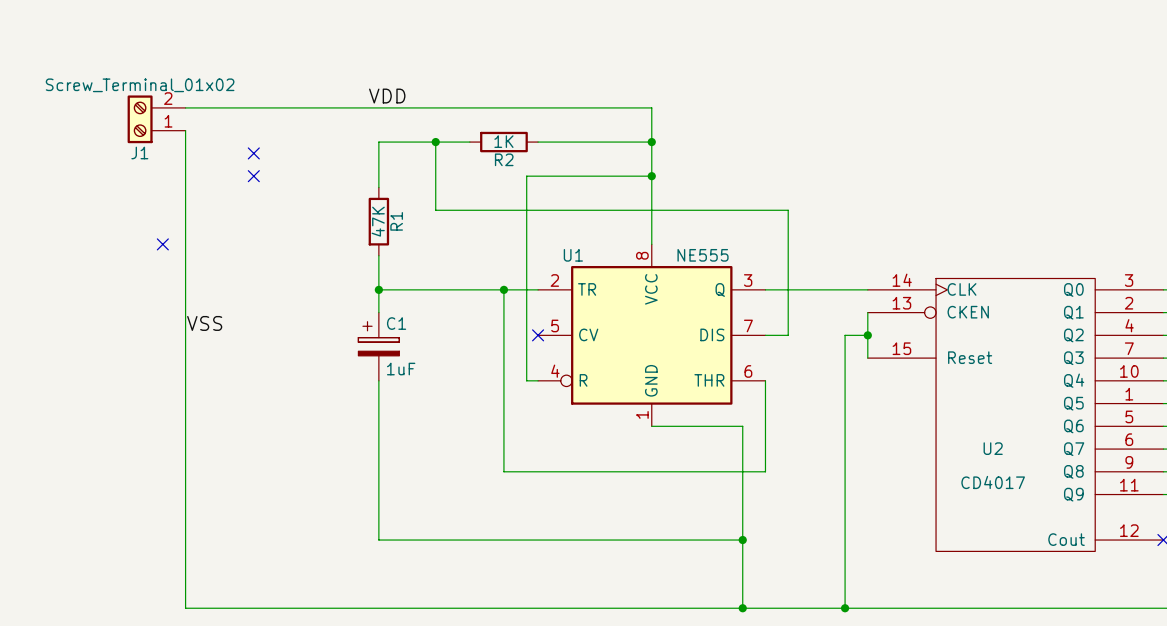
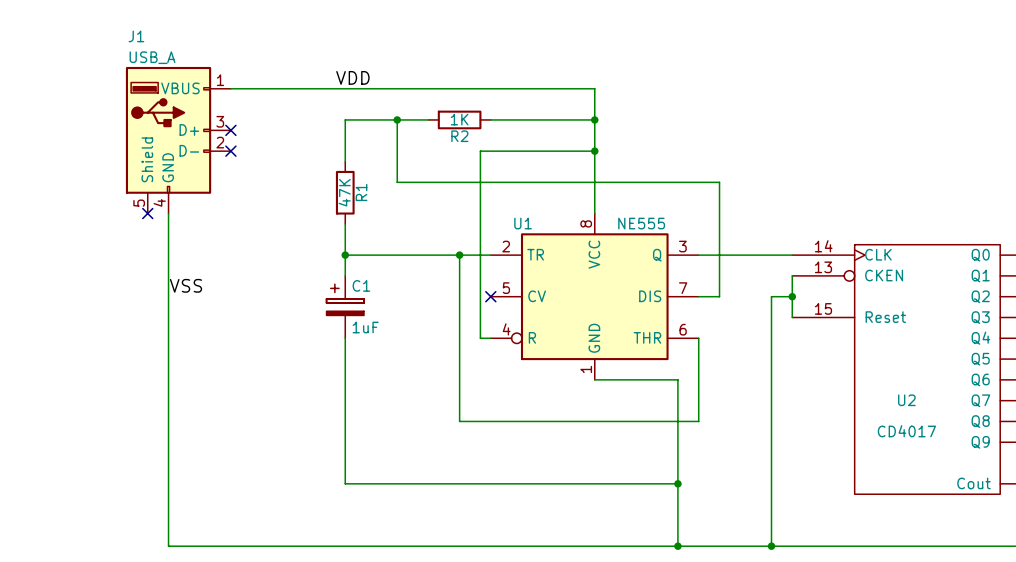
J1 value: Screw_Terminal_01x02 (140, 85) -> USB_A (152, 57)
J1 symbol: [127, 95, 186, 144] -> [125, 66, 231, 214]
J1 name position: J1 (139, 153) -> J1 (136, 36)

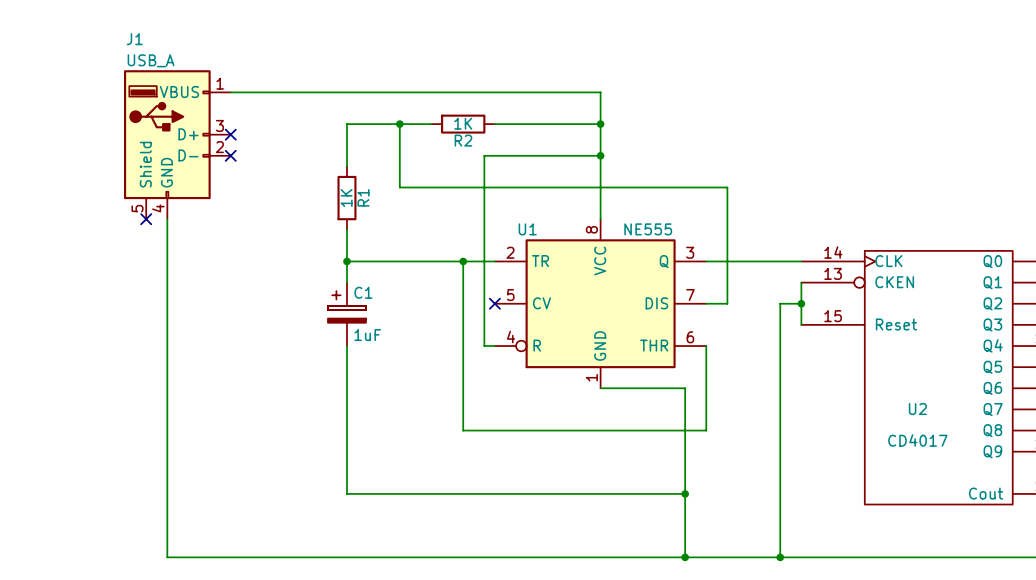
label: VDD (352, 77) -> none
R1 value: 47K (344, 192) -> 1K (346, 198)
label: VSS (185, 285) -> none

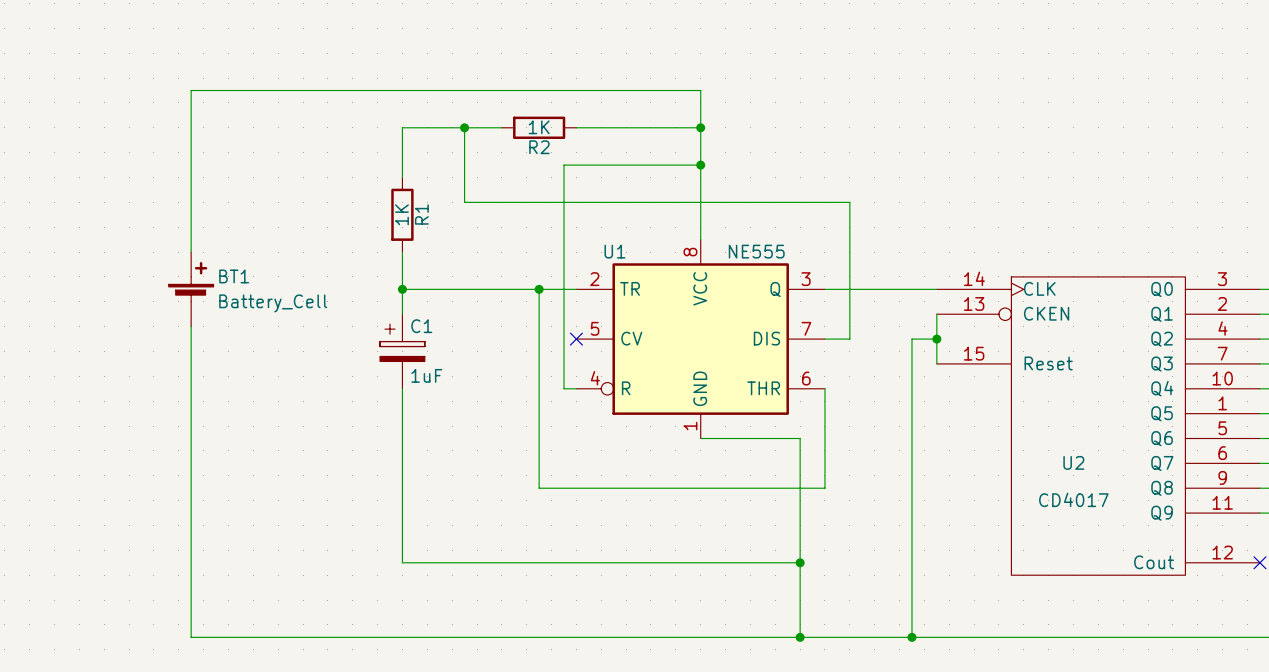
no-connect mark: (230, 134) -> none
J1: USB_A (177, 144) -> none
no-connect mark: (230, 155) -> none
no-connect mark: (146, 219) -> none
BT1: none -> Battery_Cell (191, 289)

